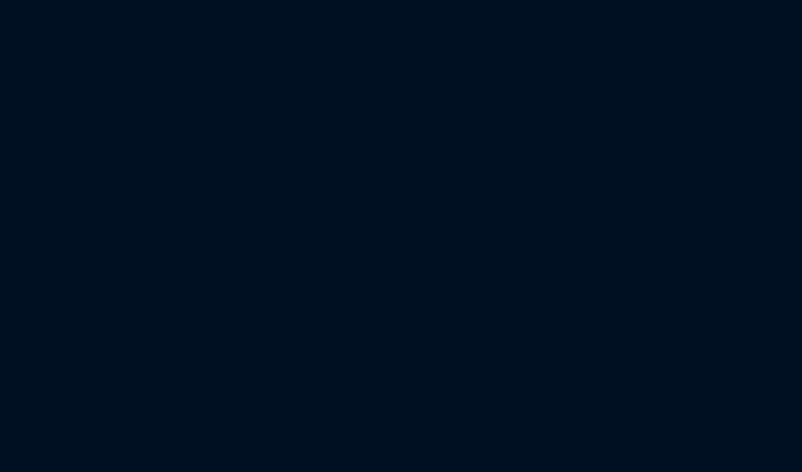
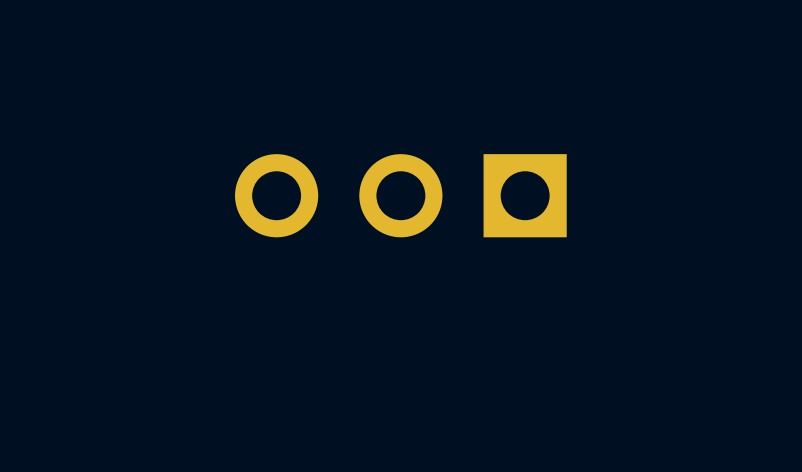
part: none -> (400, 195)

